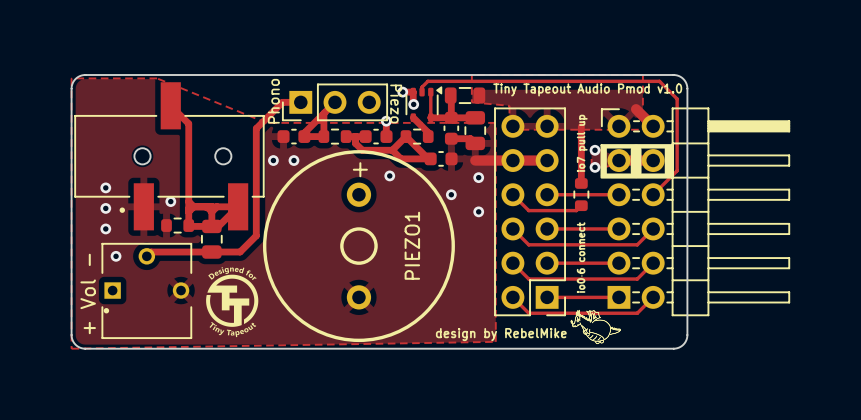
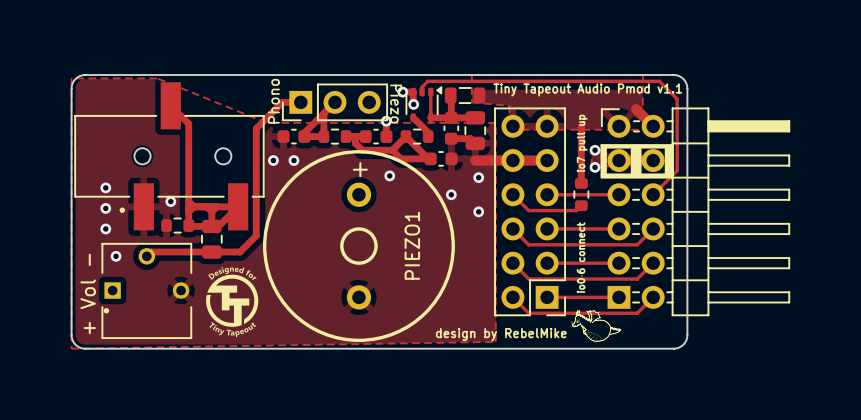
text: Tiny Tapeout Audio Pmod v1.0 (587, 89) -> Tiny Tapeout Audio Pmod v1.1 (587, 89)
drawing: [570, 312, 605, 345] -> none
drawing: none -> [571, 314, 602, 343]

